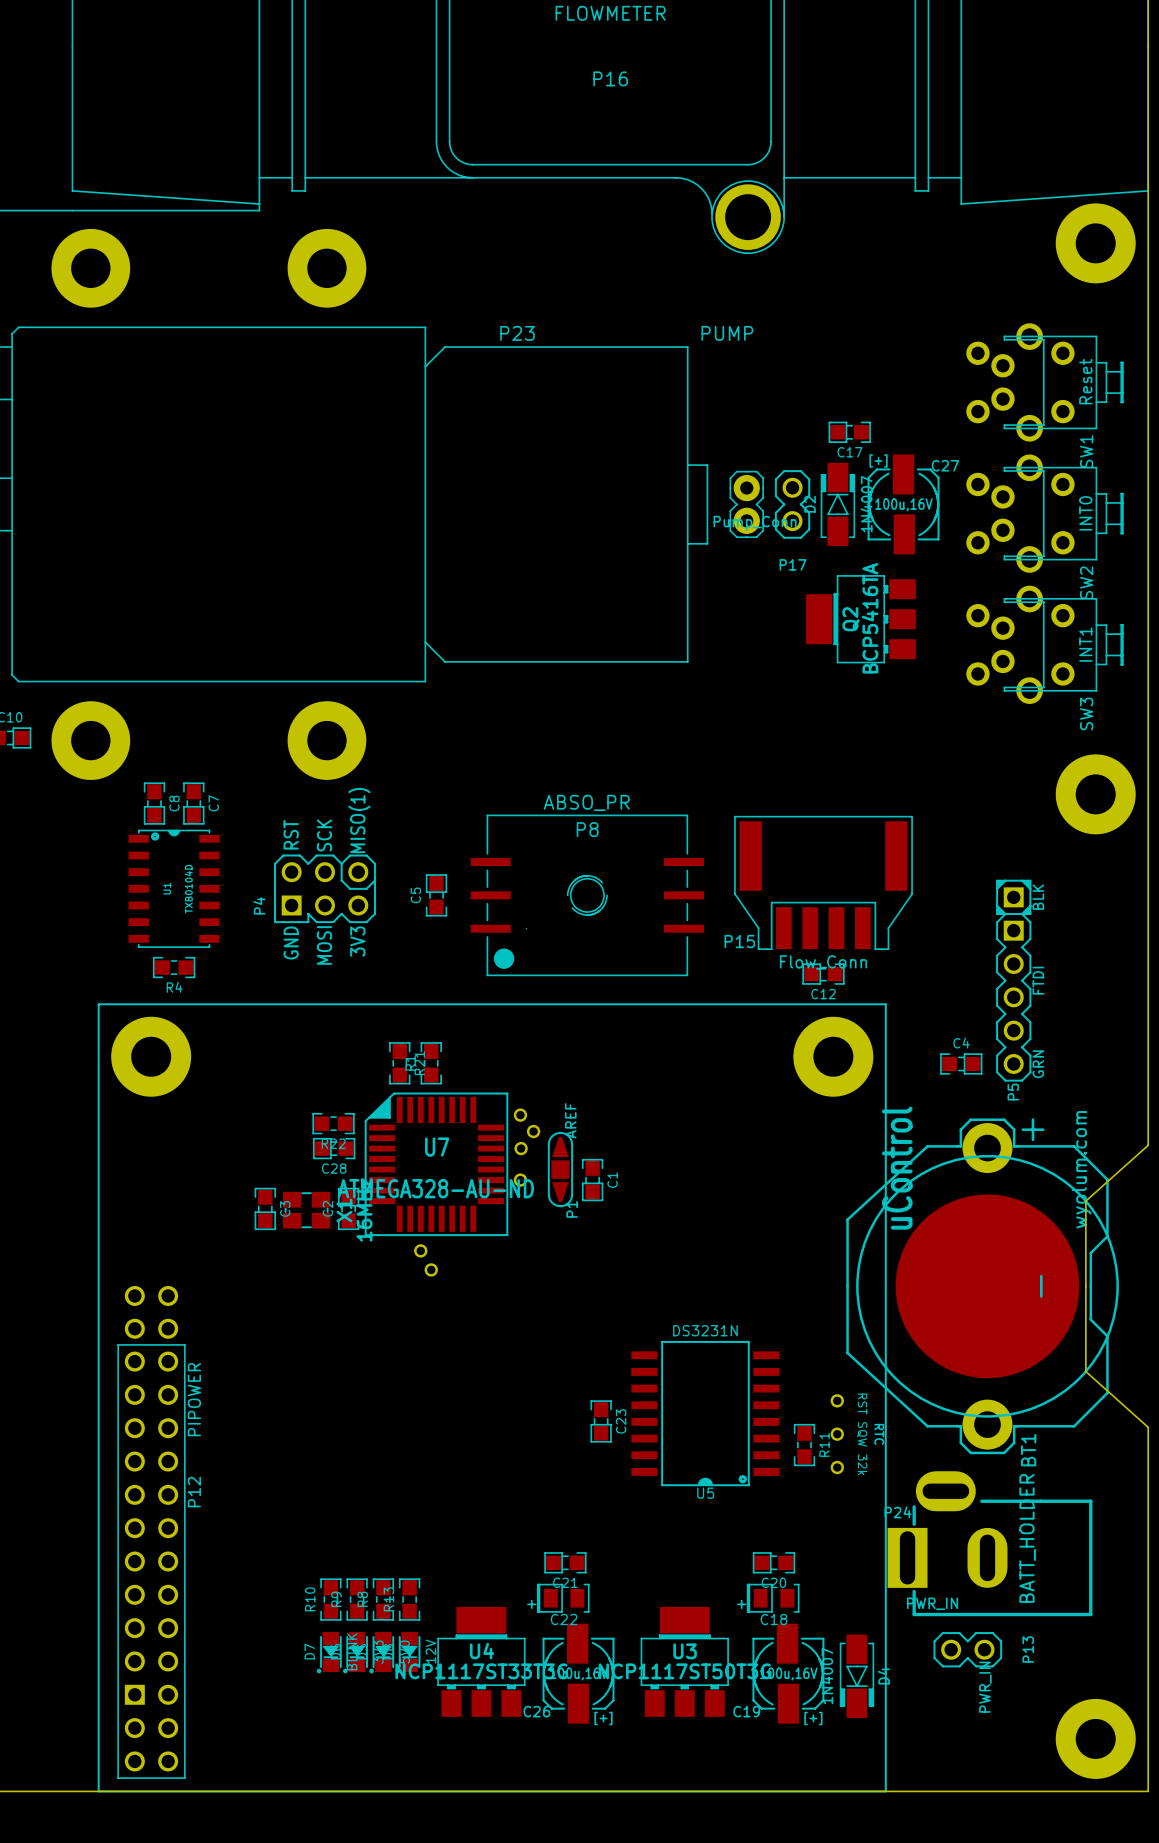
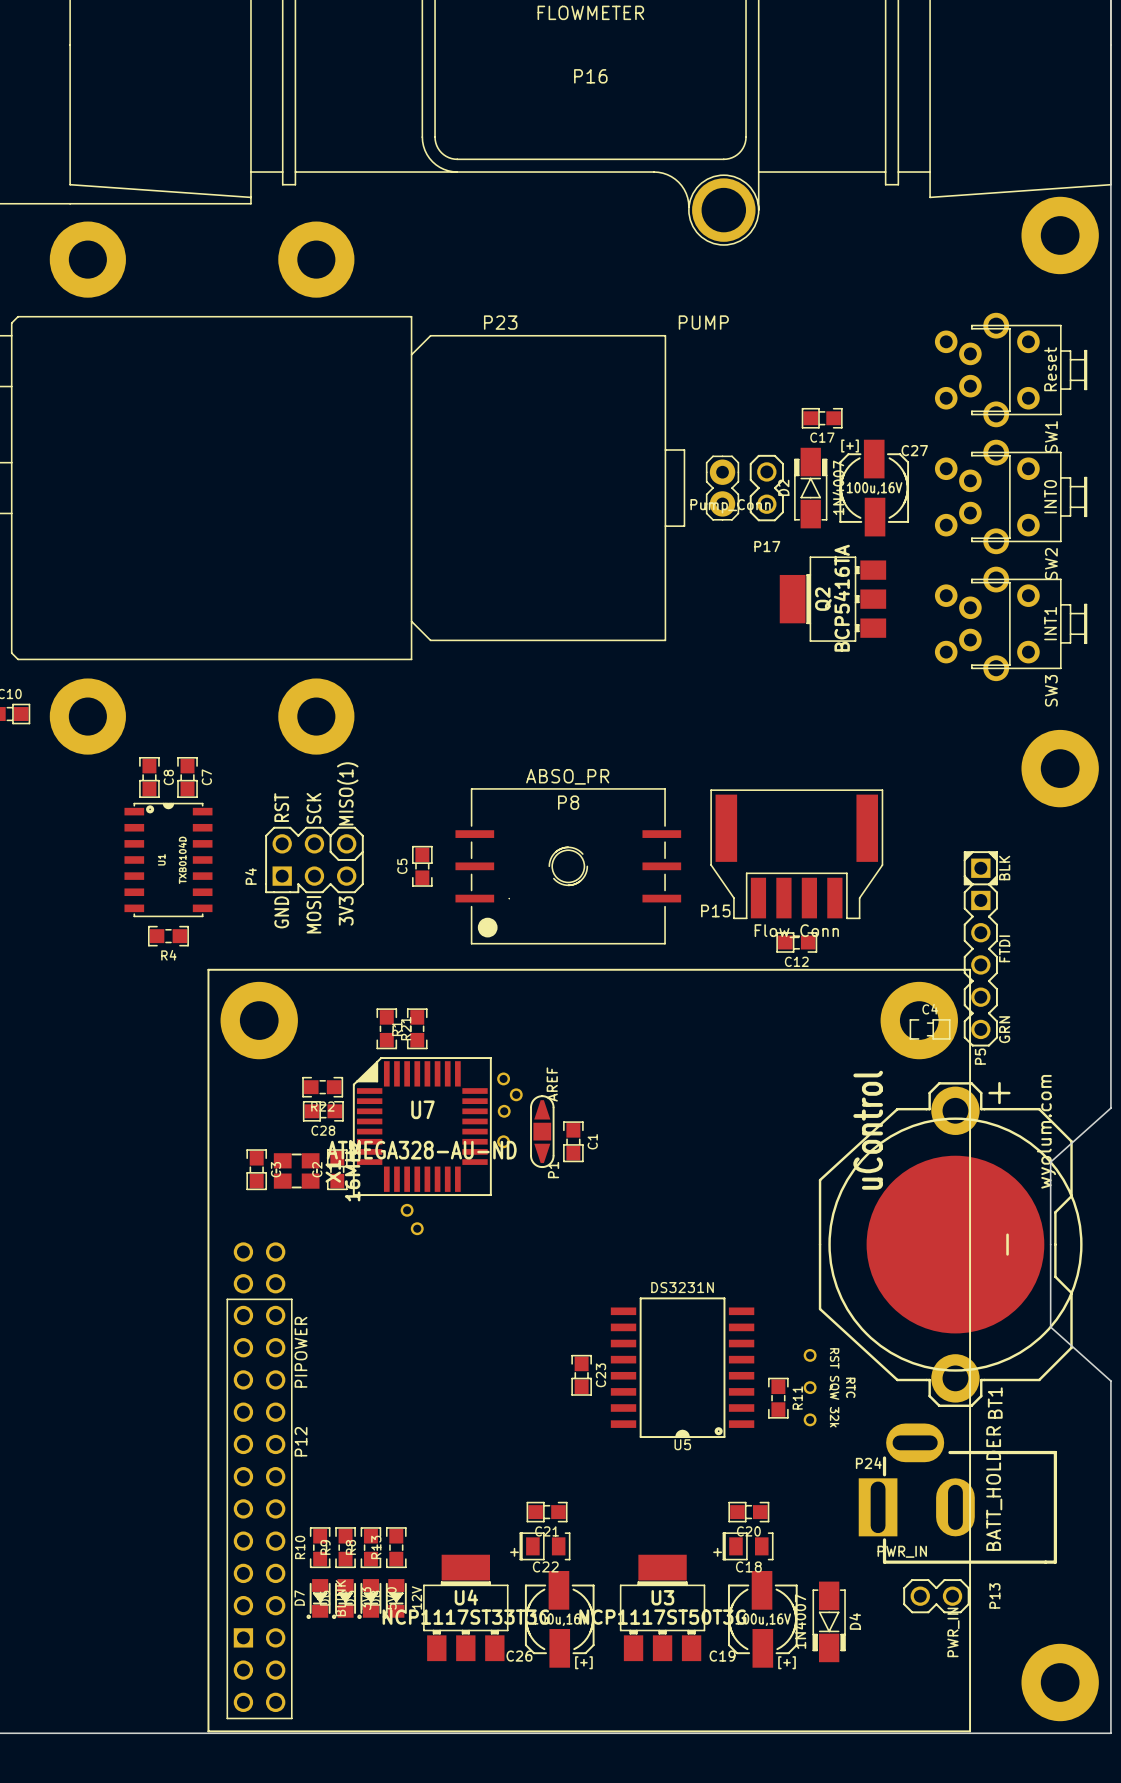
P12 position: (492, 1397) -> (589, 1350)

